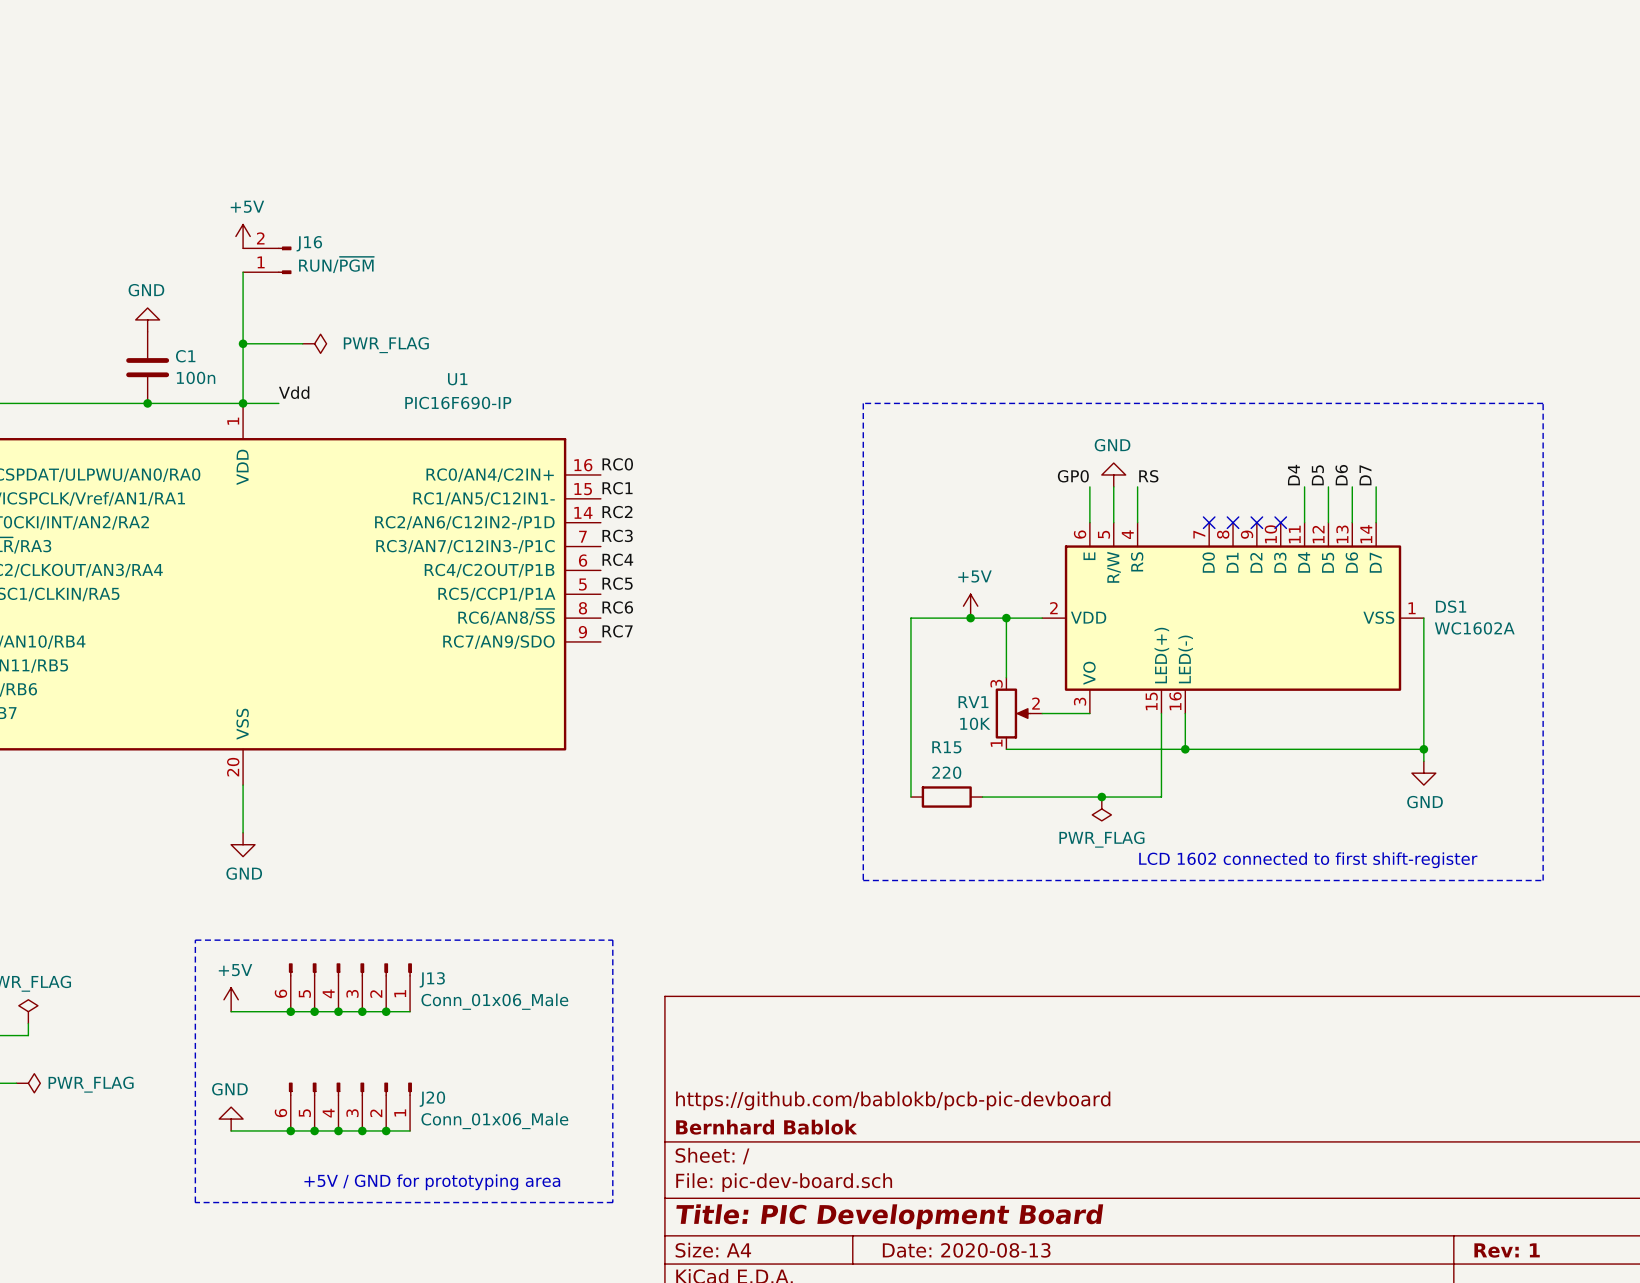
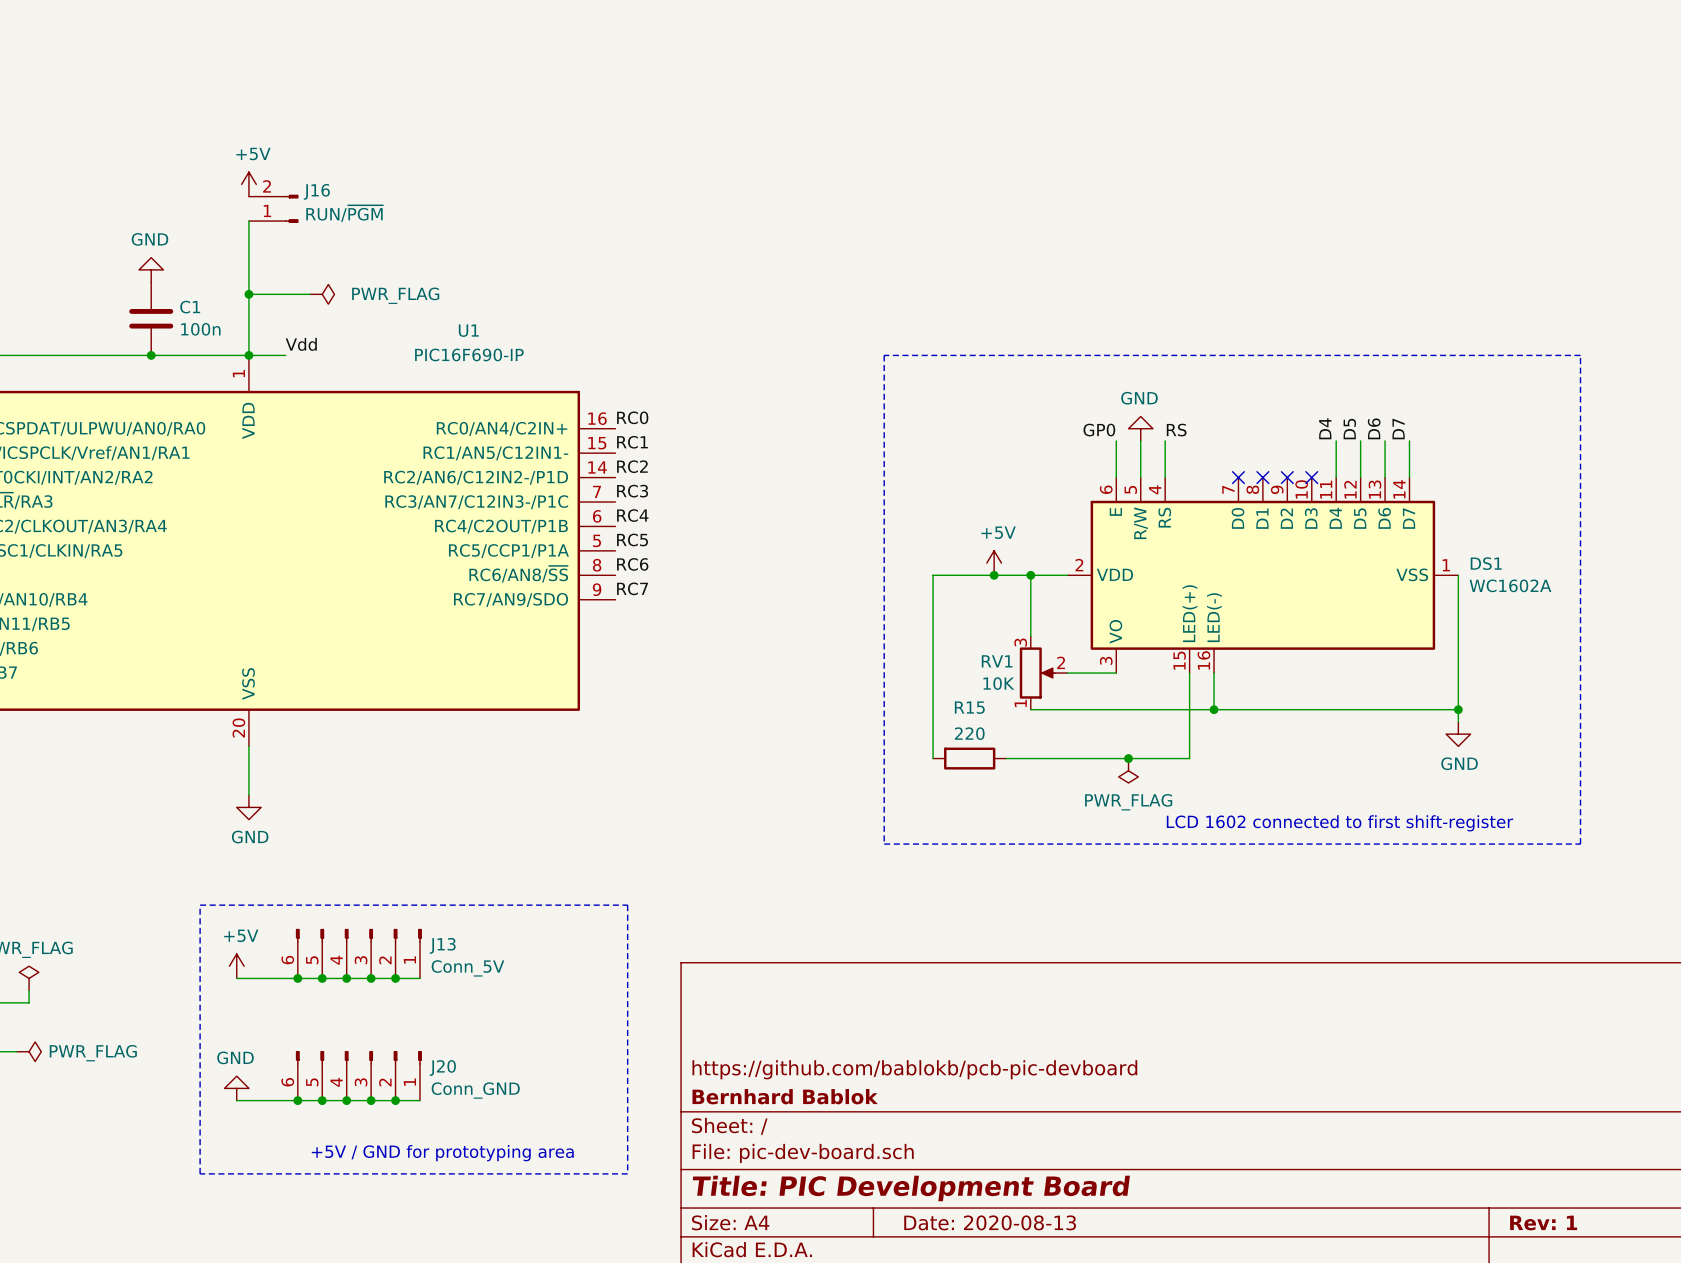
J13 value: Conn_01x06_Male (494, 1001) -> Conn_5V (467, 968)
J20 value: Conn_01x06_Male (494, 1121) -> Conn_GND (475, 1090)

